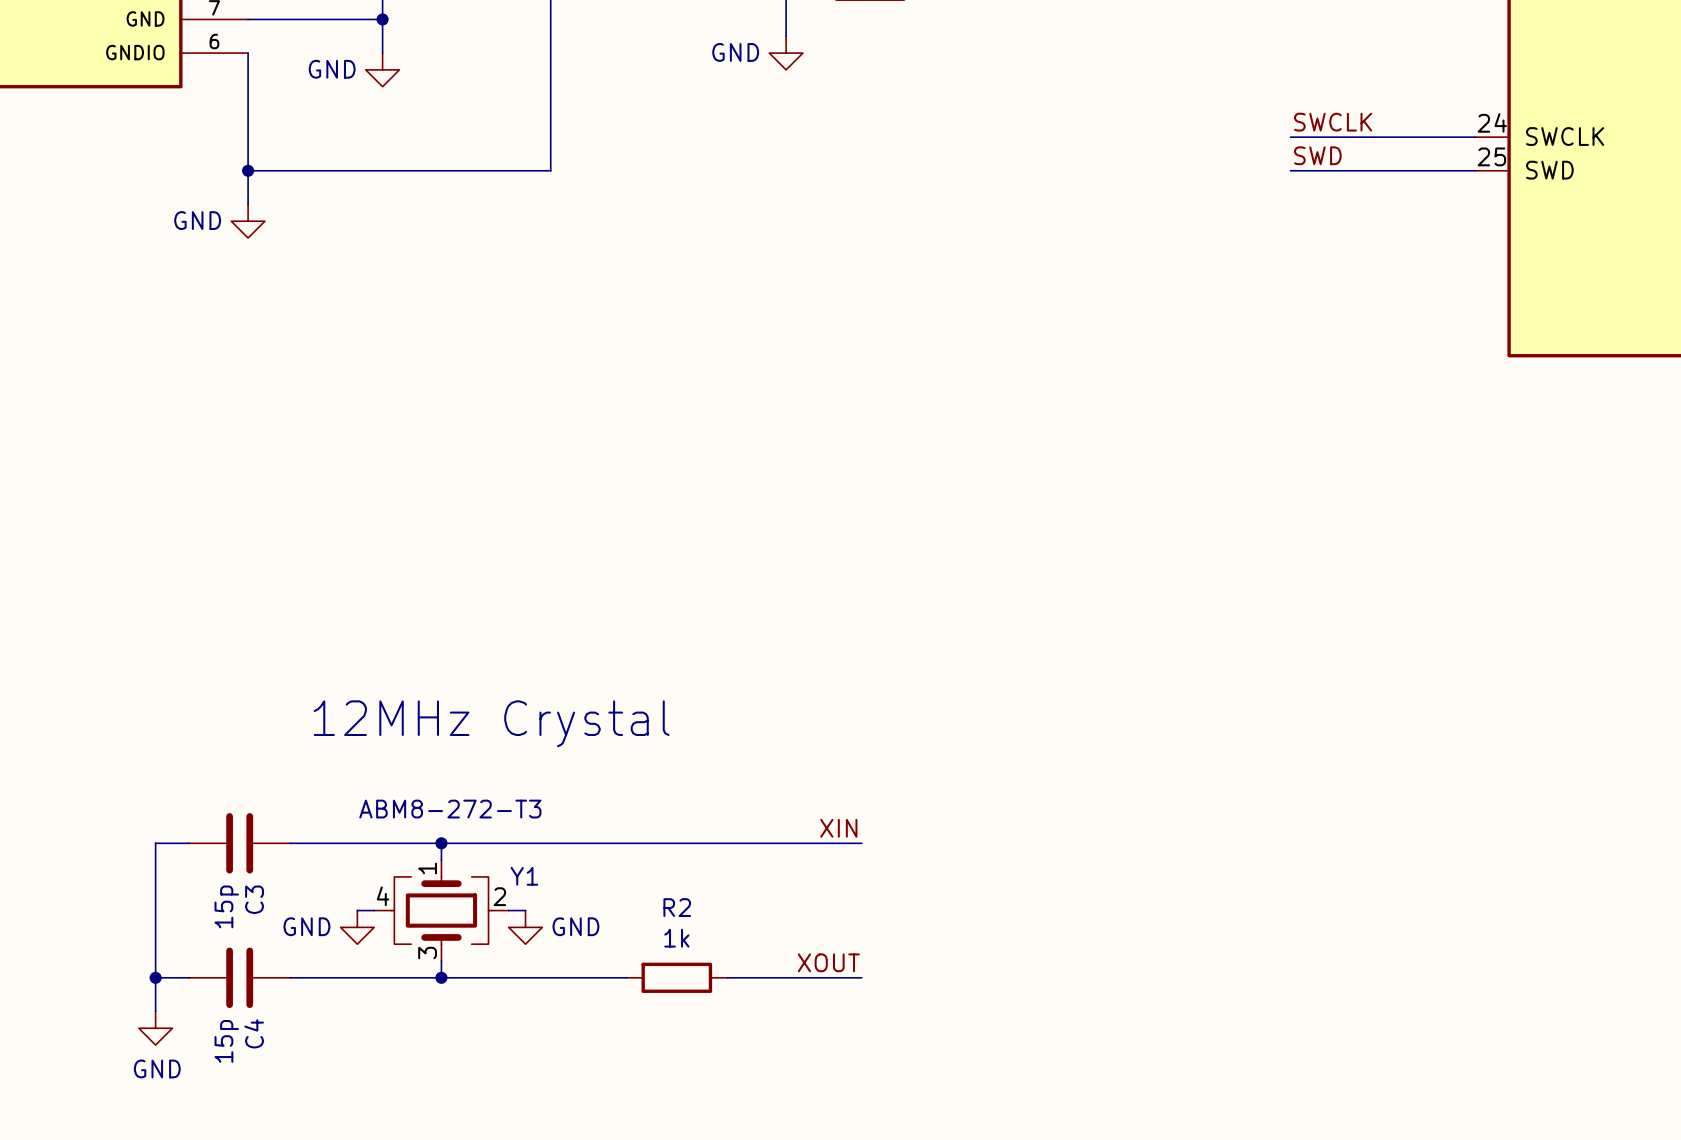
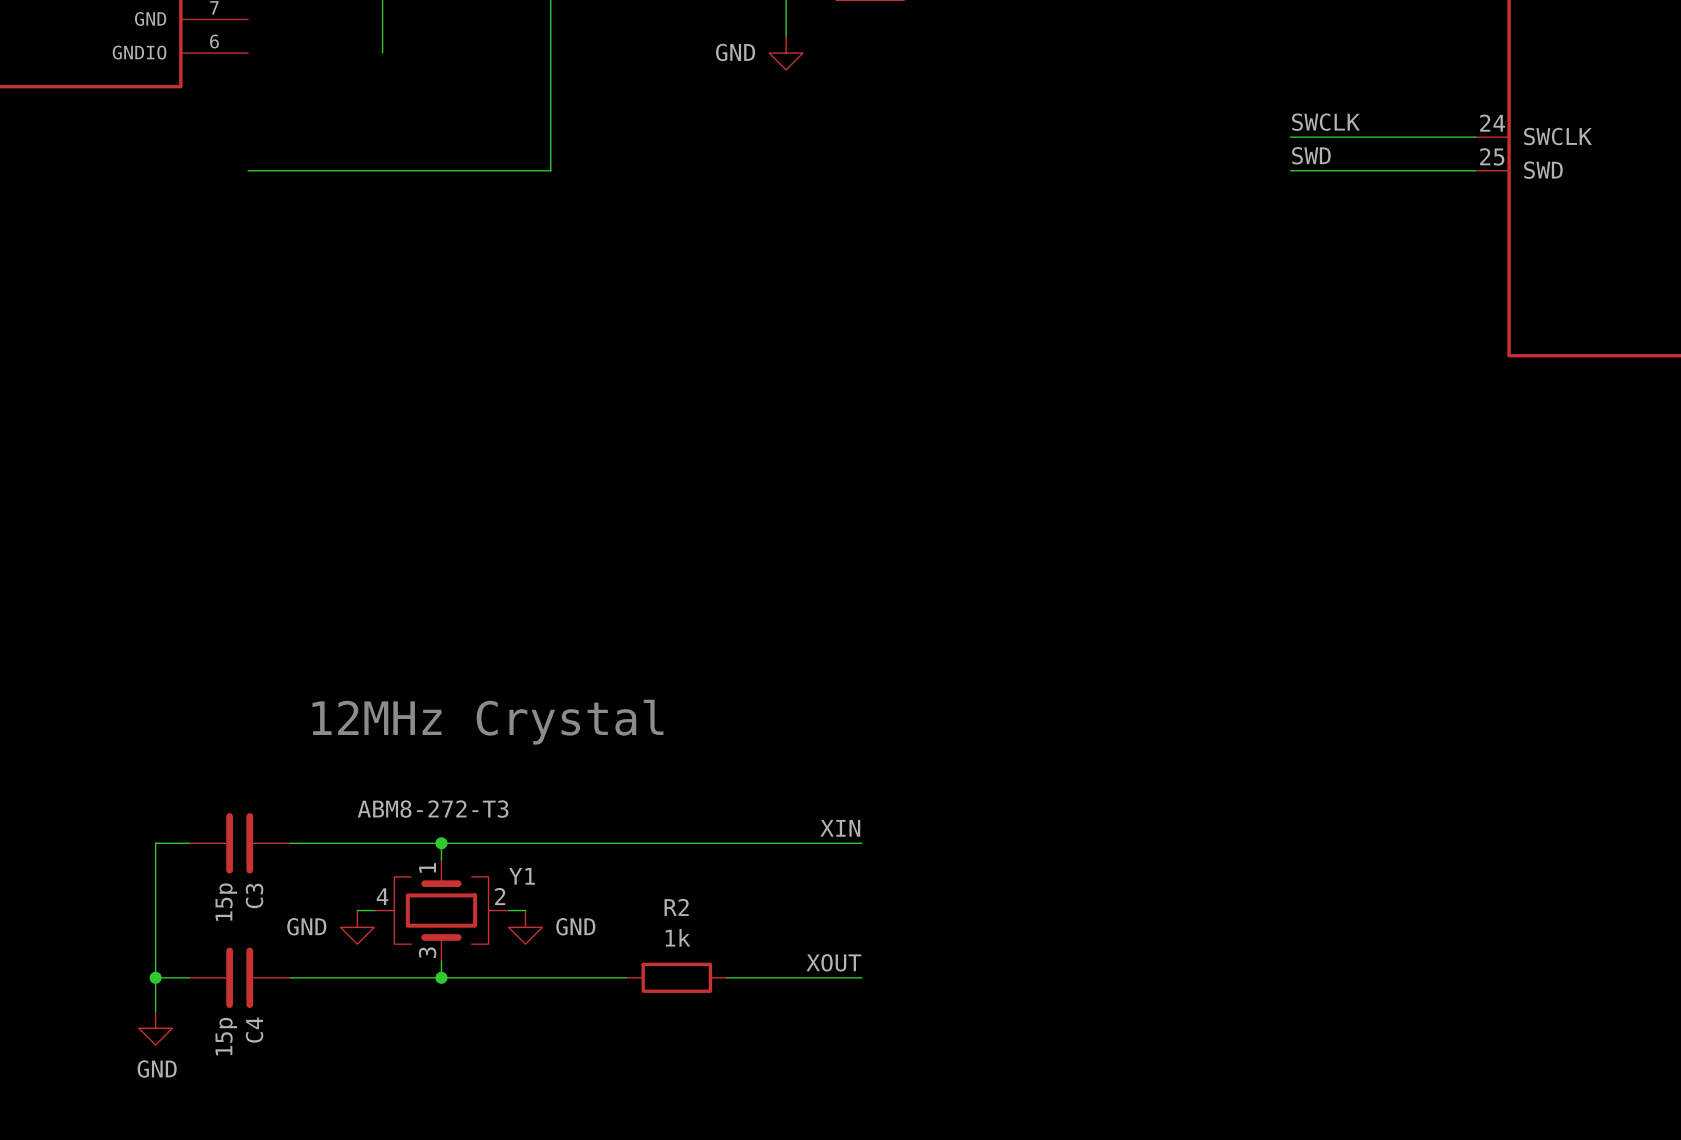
wire: (248, 19) (382, 19) -> none
junction: (382, 19) -> none
wire: (248, 53) (248, 204) -> none
power symbol: GND (382, 69) -> none
junction: (248, 170) -> none
power symbol: GND (248, 221) -> none

